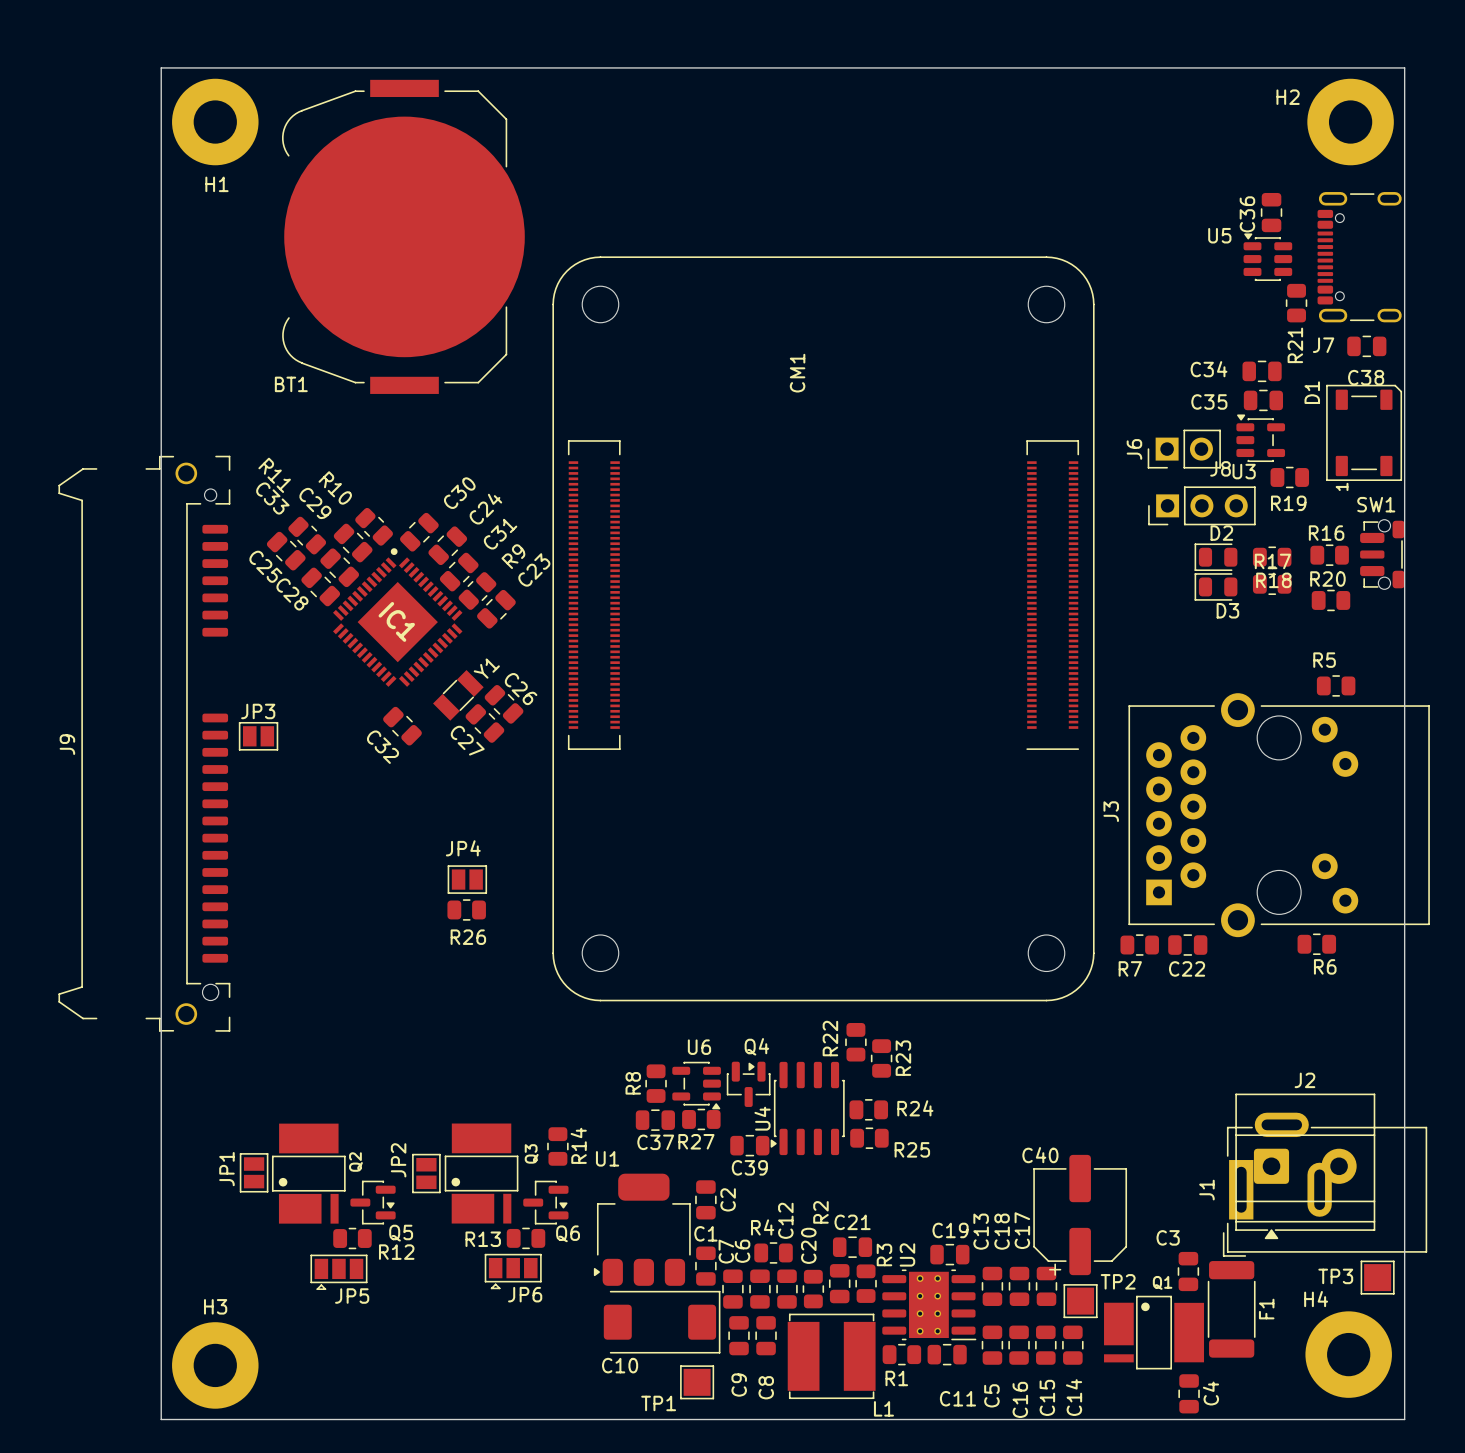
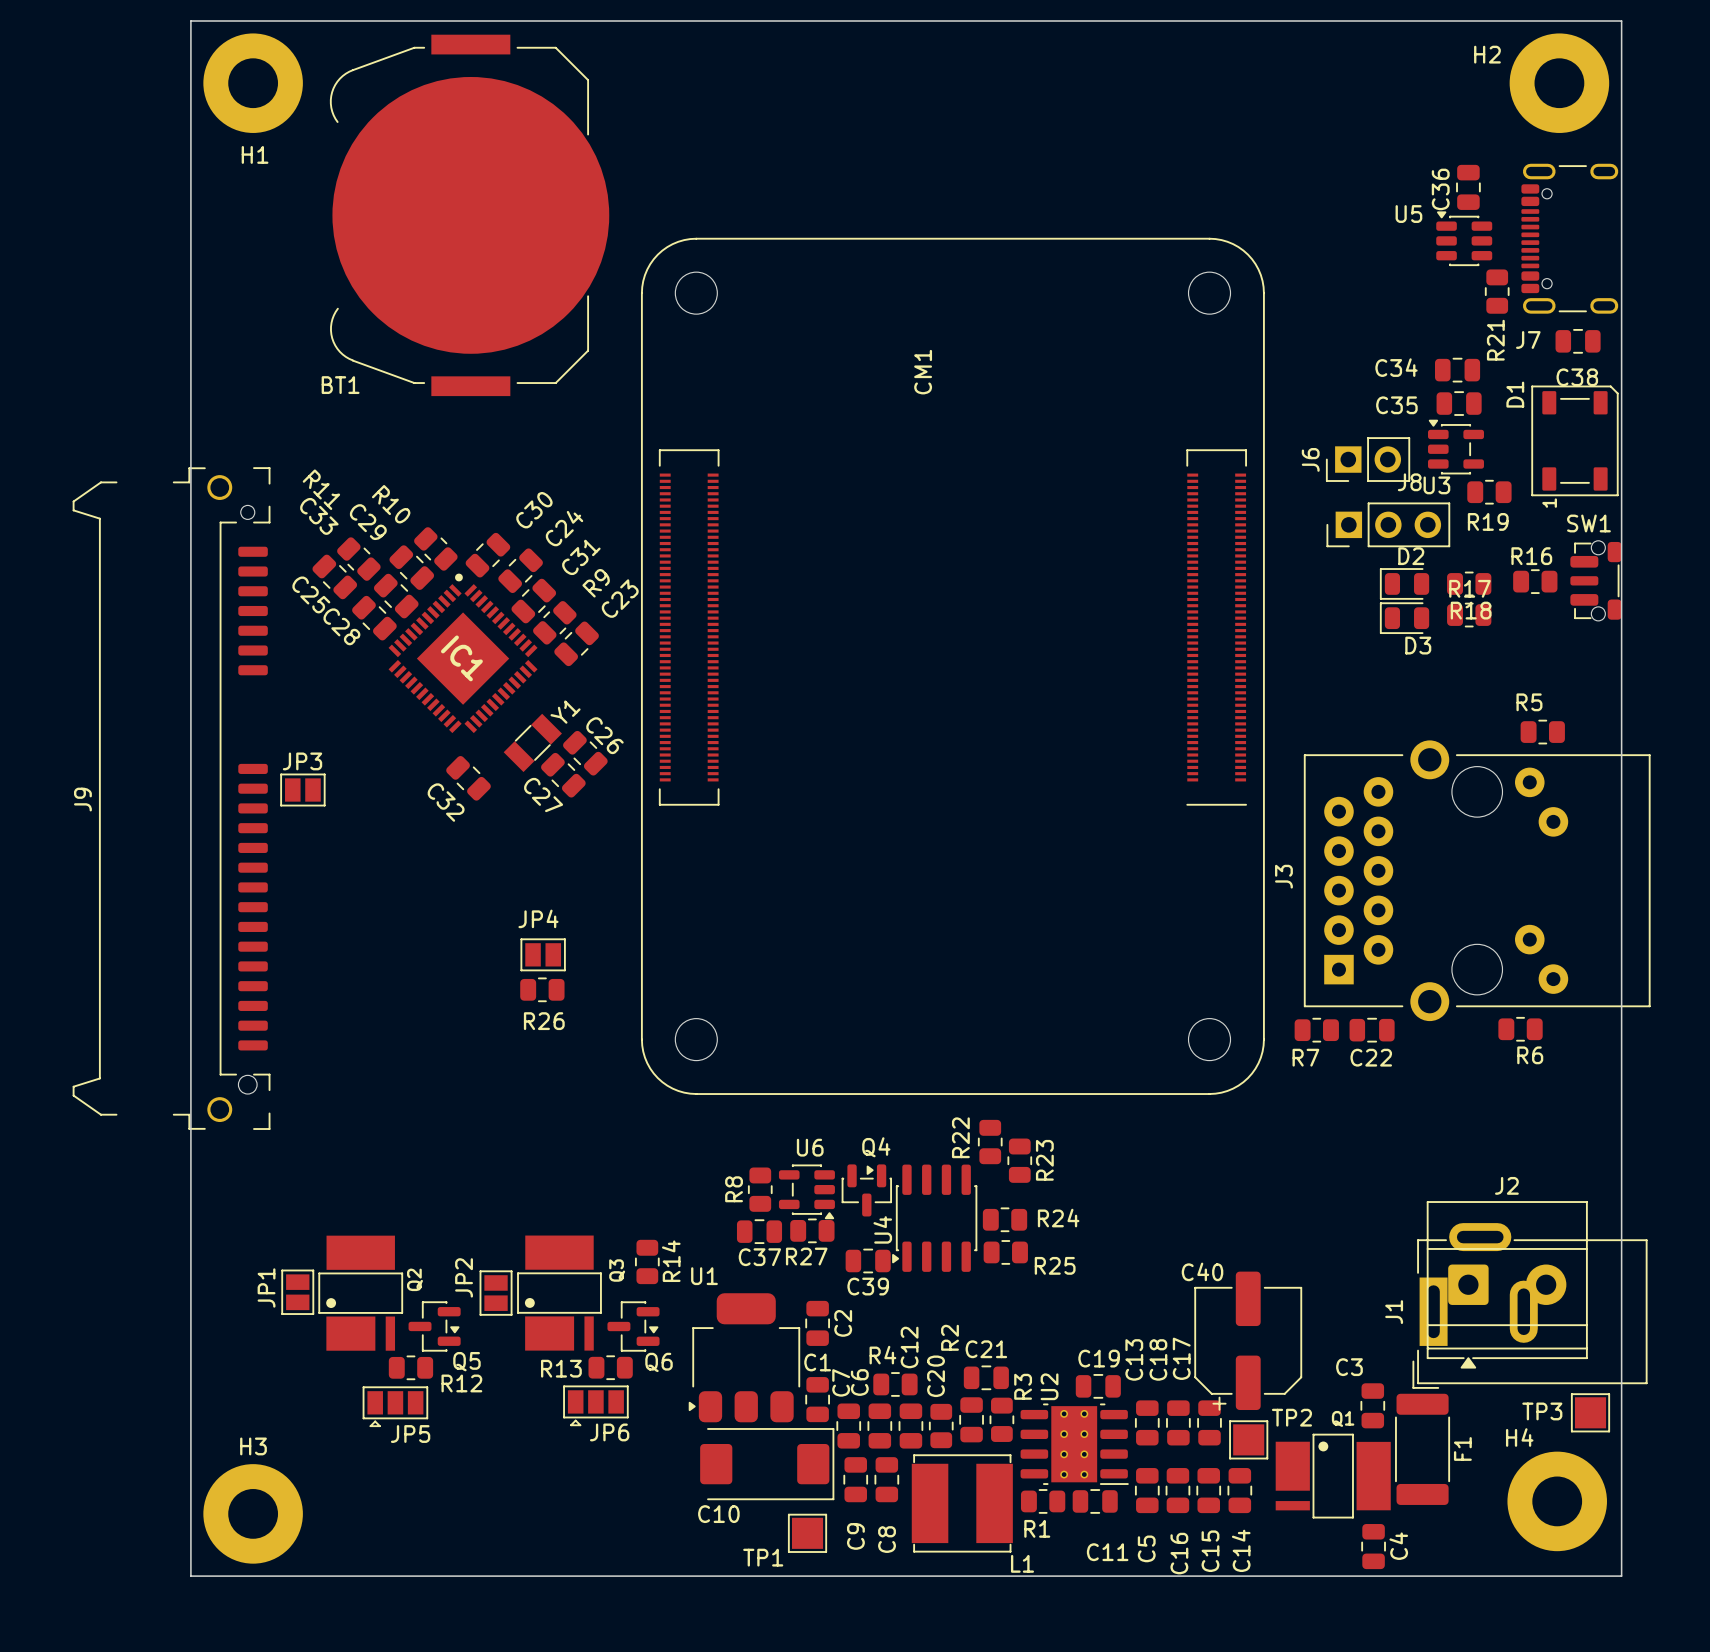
R20: (1330, 600) -> none

